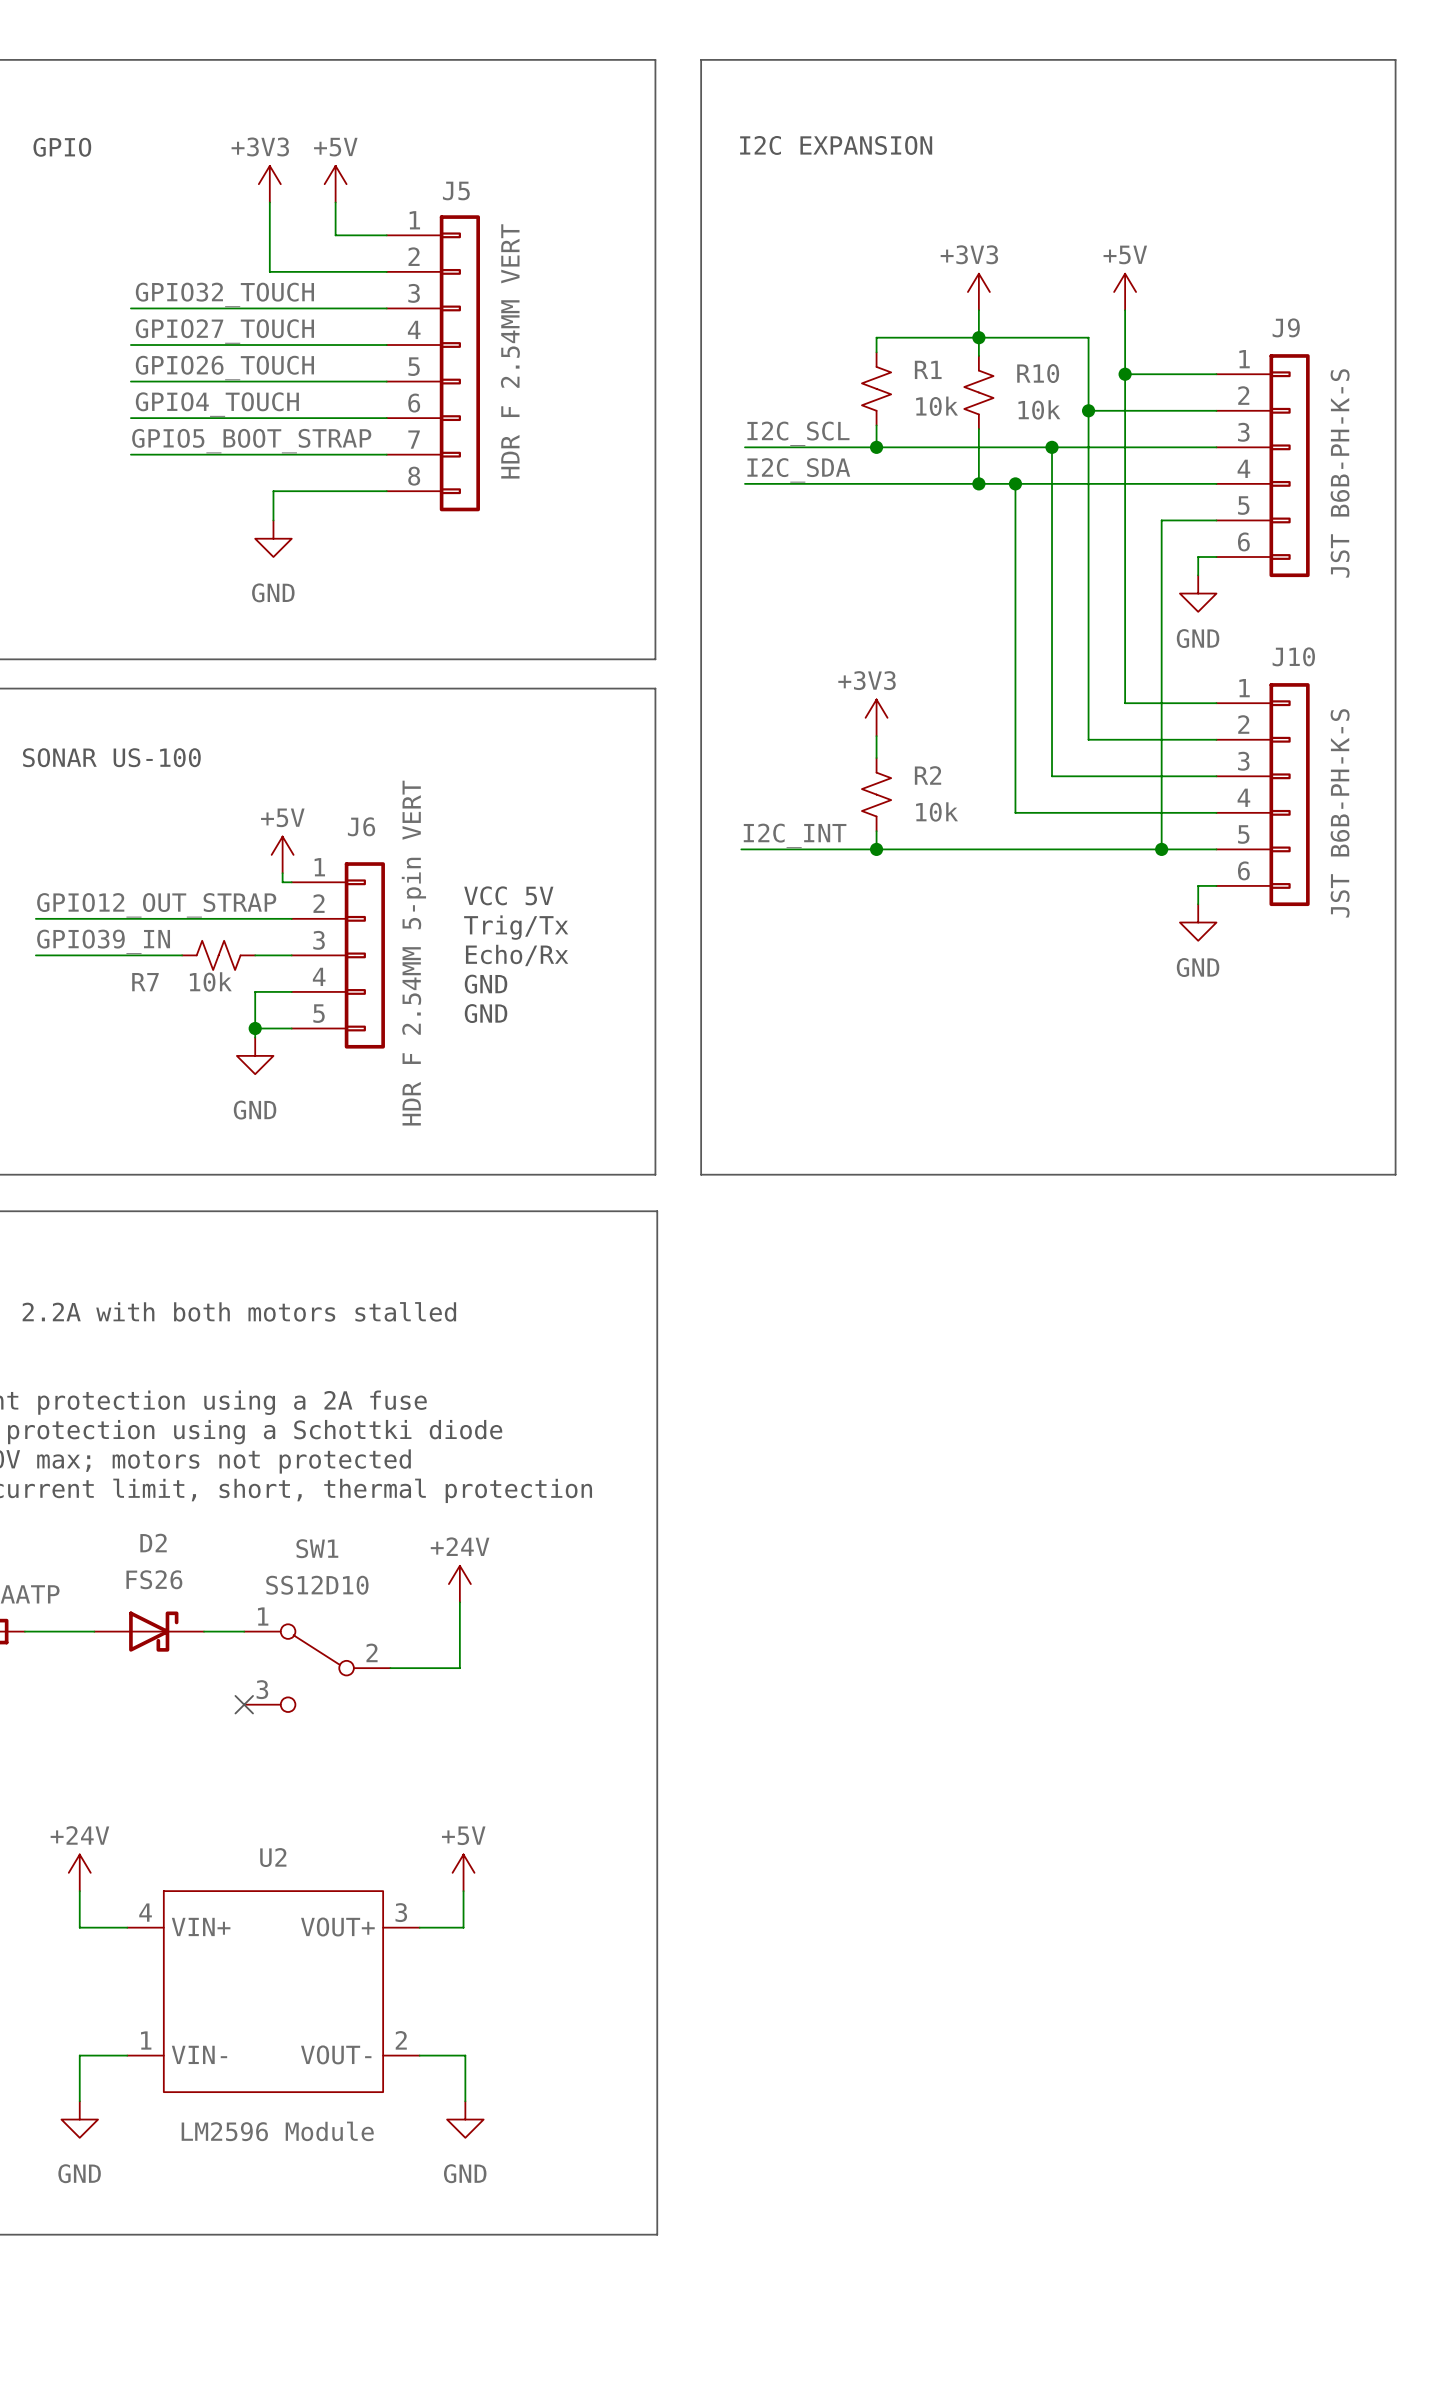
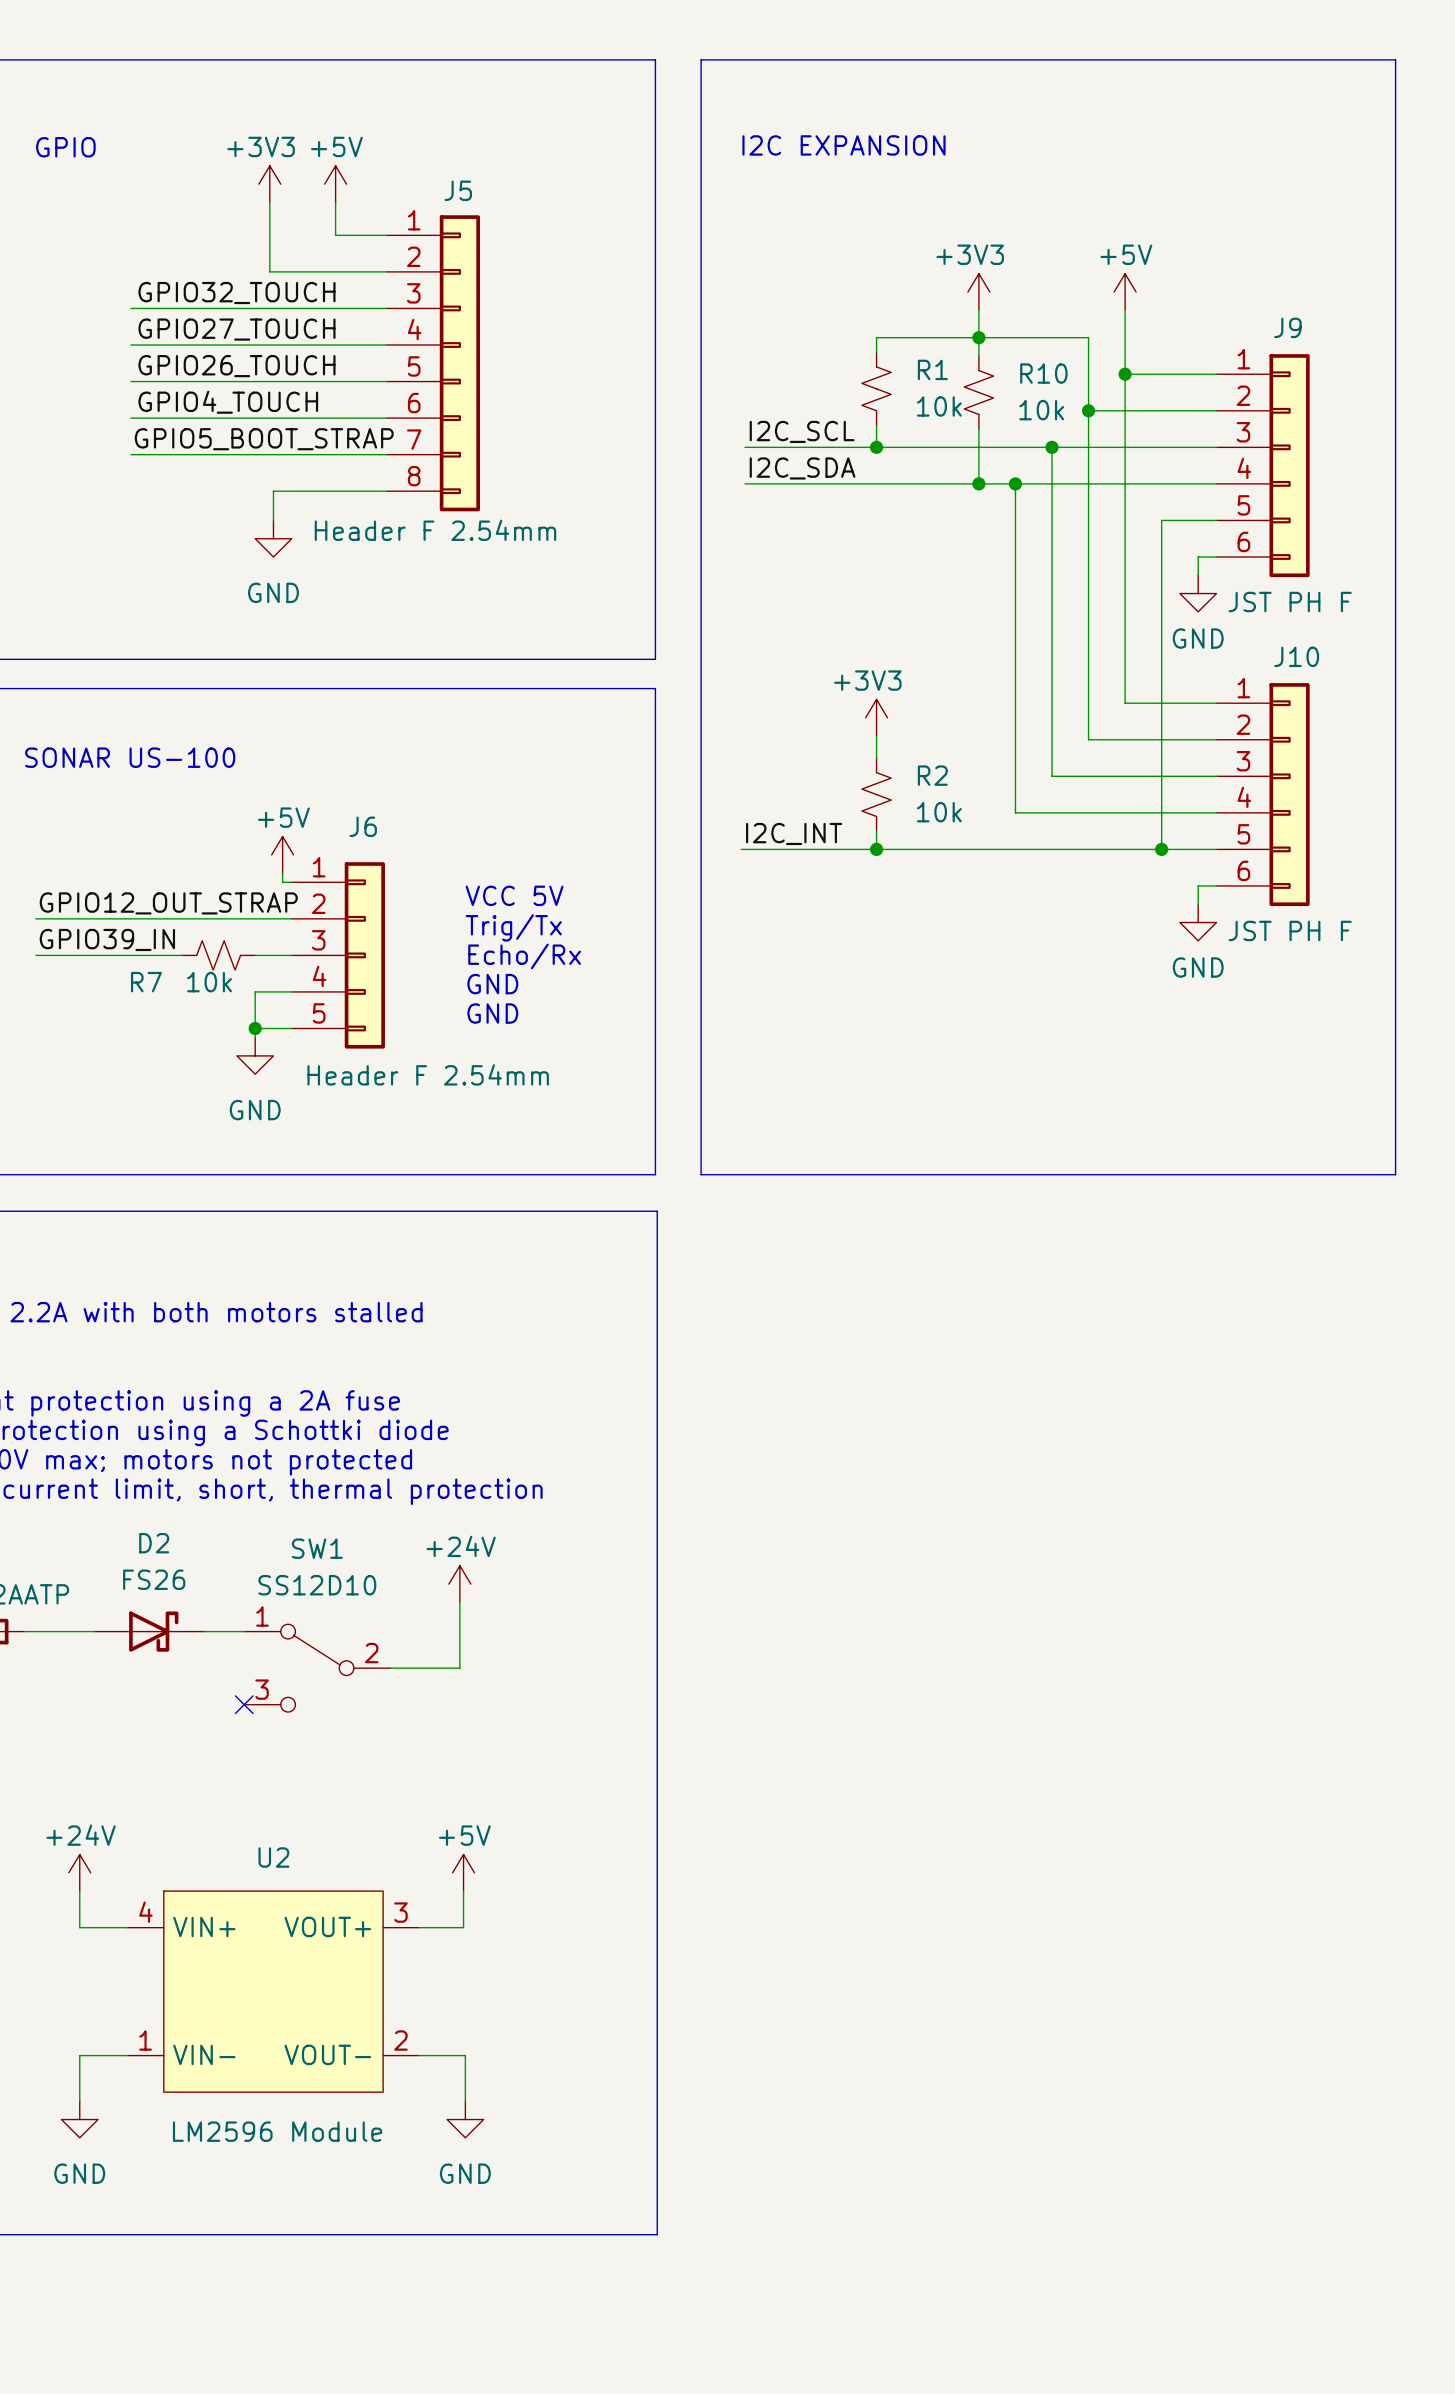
J5 value: HDR F 2.54MM VERT (510, 351) -> Header F 2.54mm (435, 530)
J9 value: JST B6B-PH-K-S (1340, 473) -> JST PH F (1290, 602)
J10 value: JST B6B-PH-K-S (1340, 813) -> JST PH F (1290, 930)
J6 value: HDR F 2.54MM 5-pin VERT (413, 953) -> Header F 2.54mm (428, 1074)

